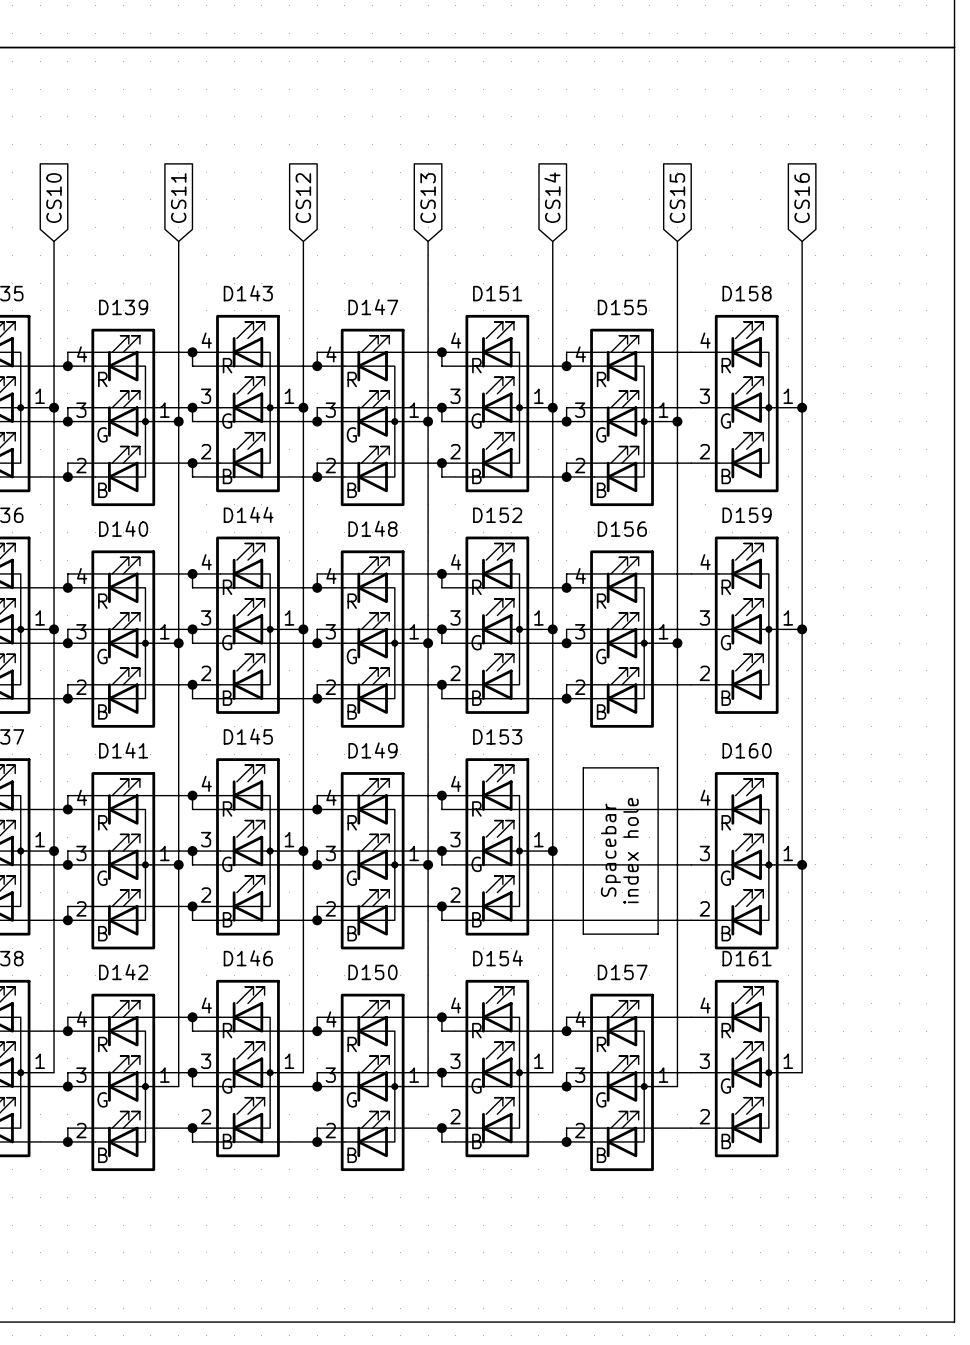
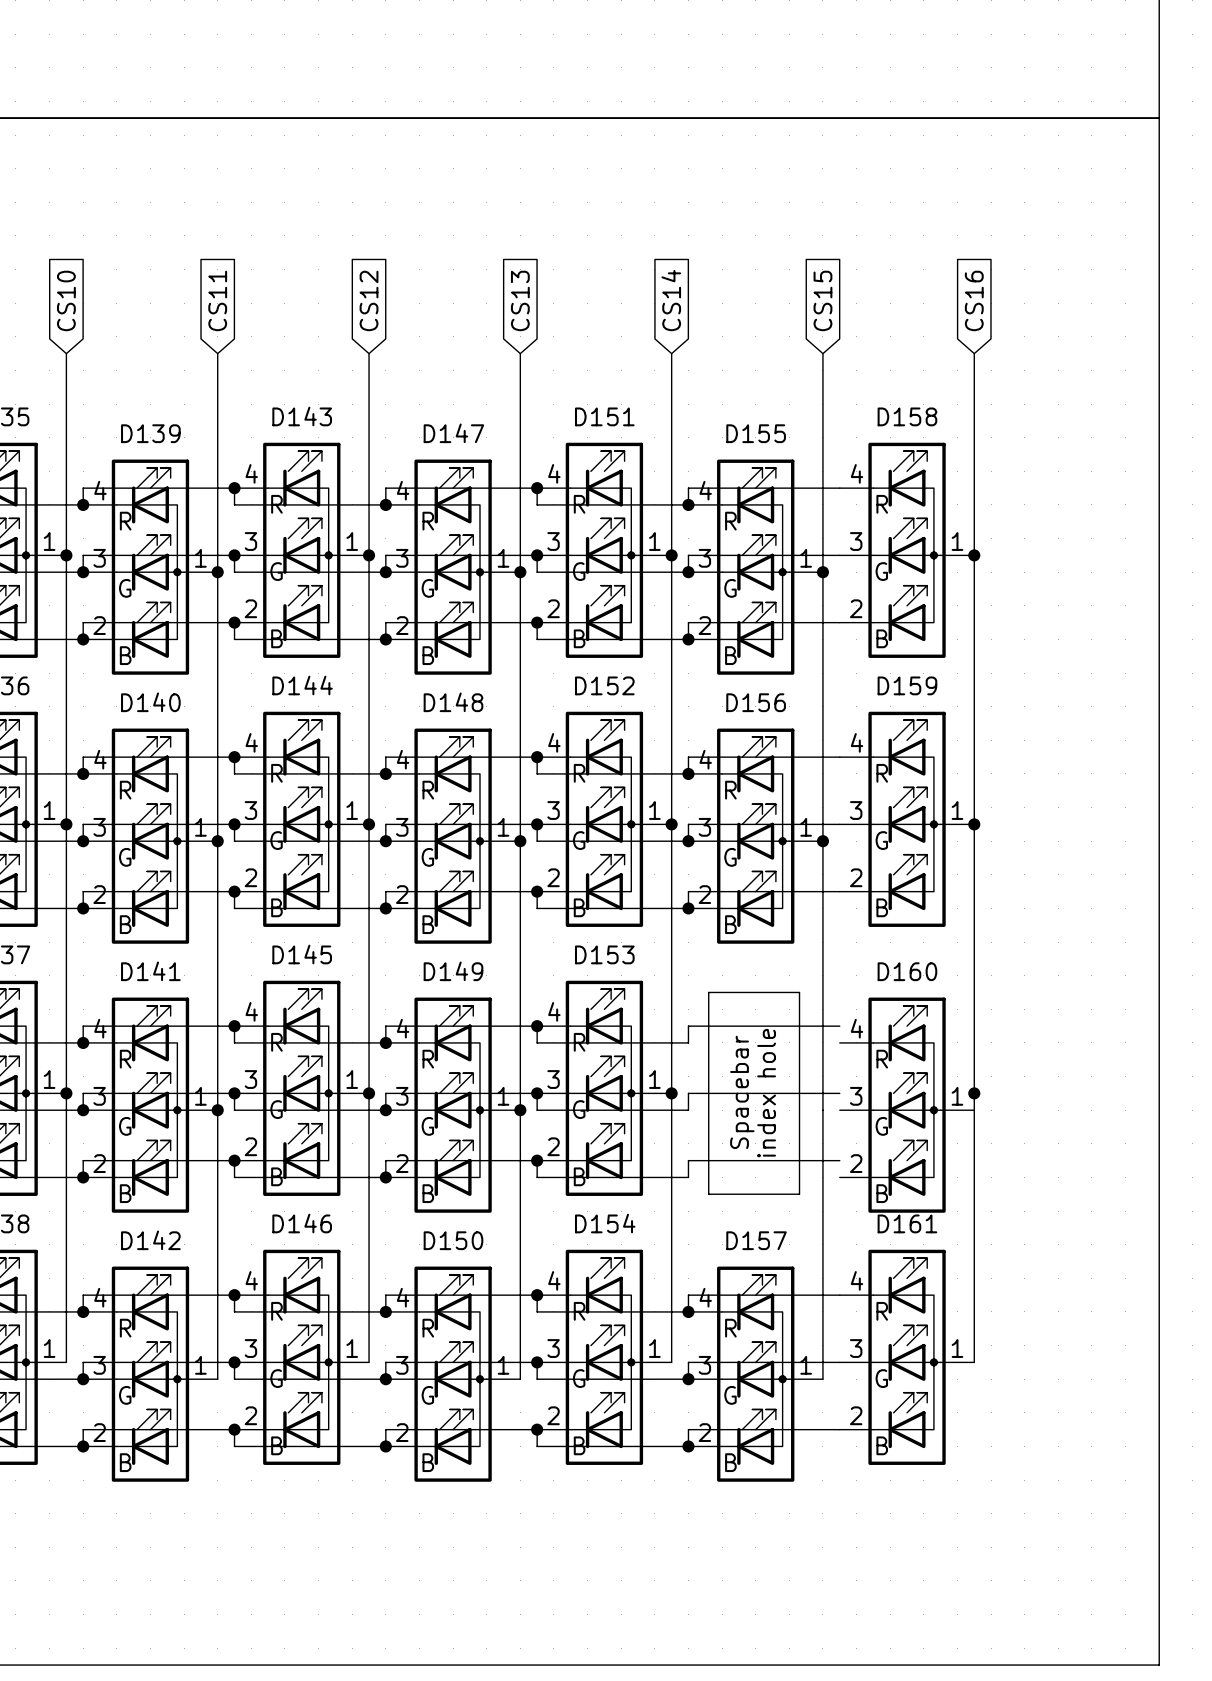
wire: (566, 809) (691, 809) -> (688, 1042) (688, 1026) (839, 1026)
wire: (566, 864) (691, 864) -> (688, 1110) (688, 1093) (839, 1093)
junction position: (802, 864) -> (974, 1093)
wire: (566, 920) (691, 920) -> (688, 1177) (688, 1160) (839, 1160)

